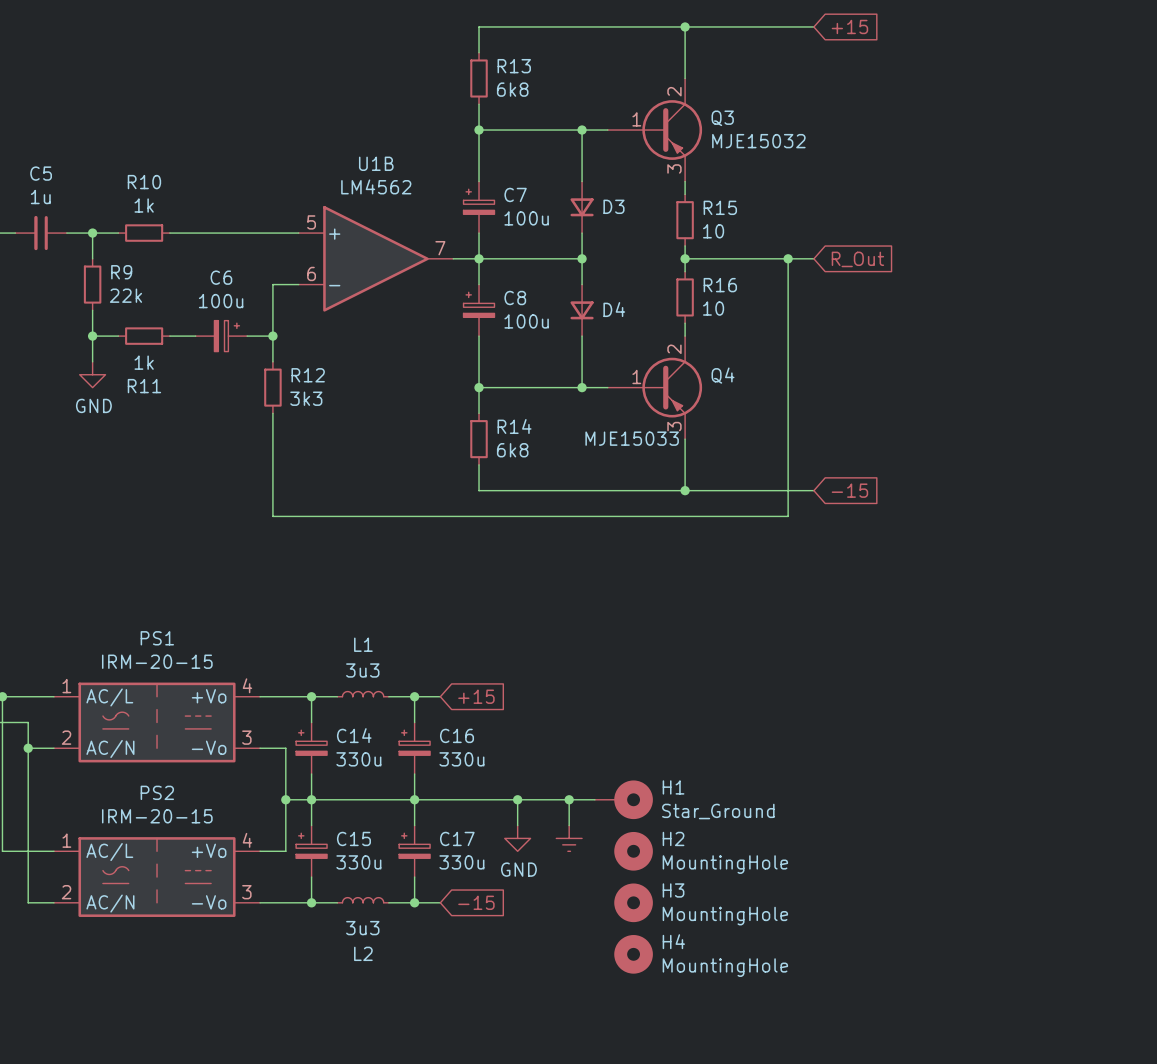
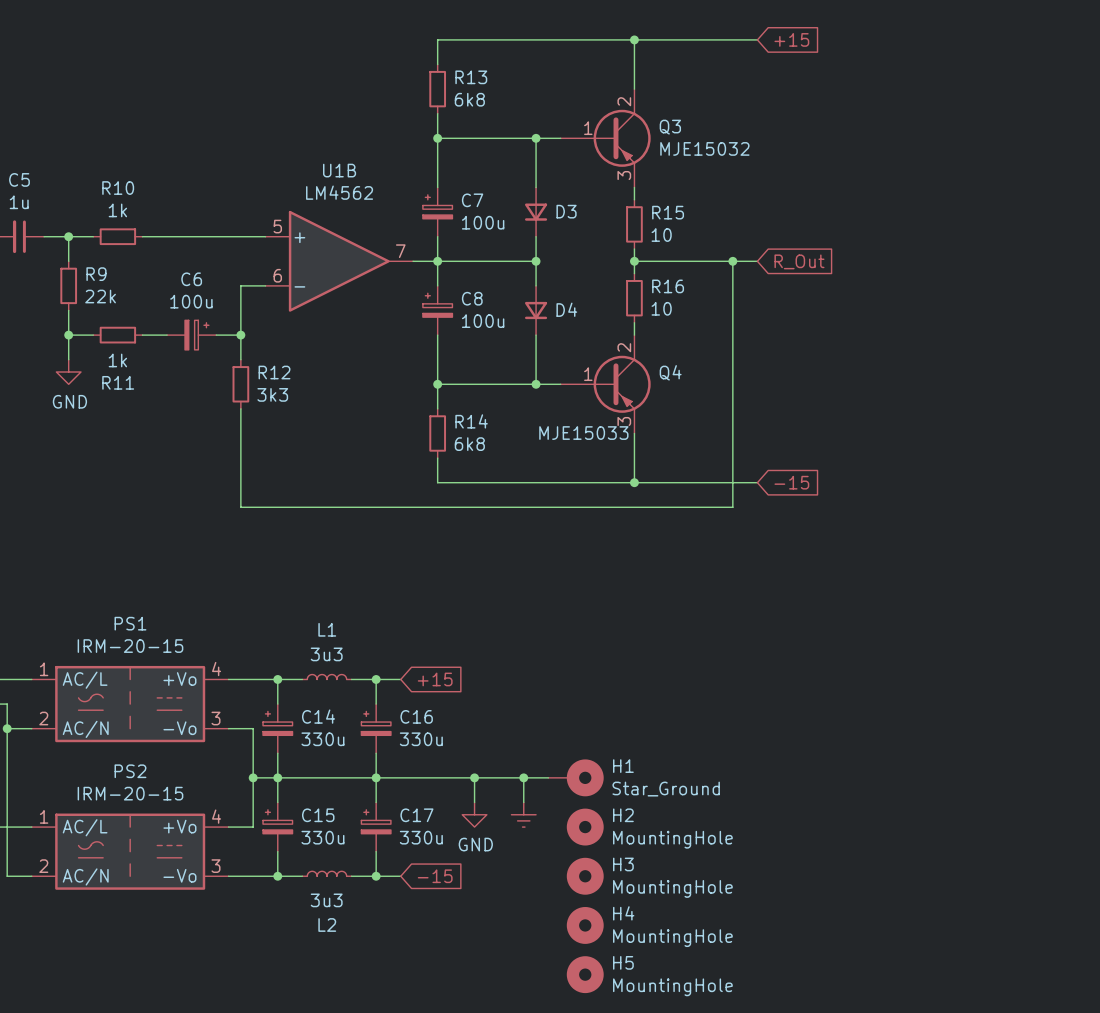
H5: none -> MountingHole (585, 974)

